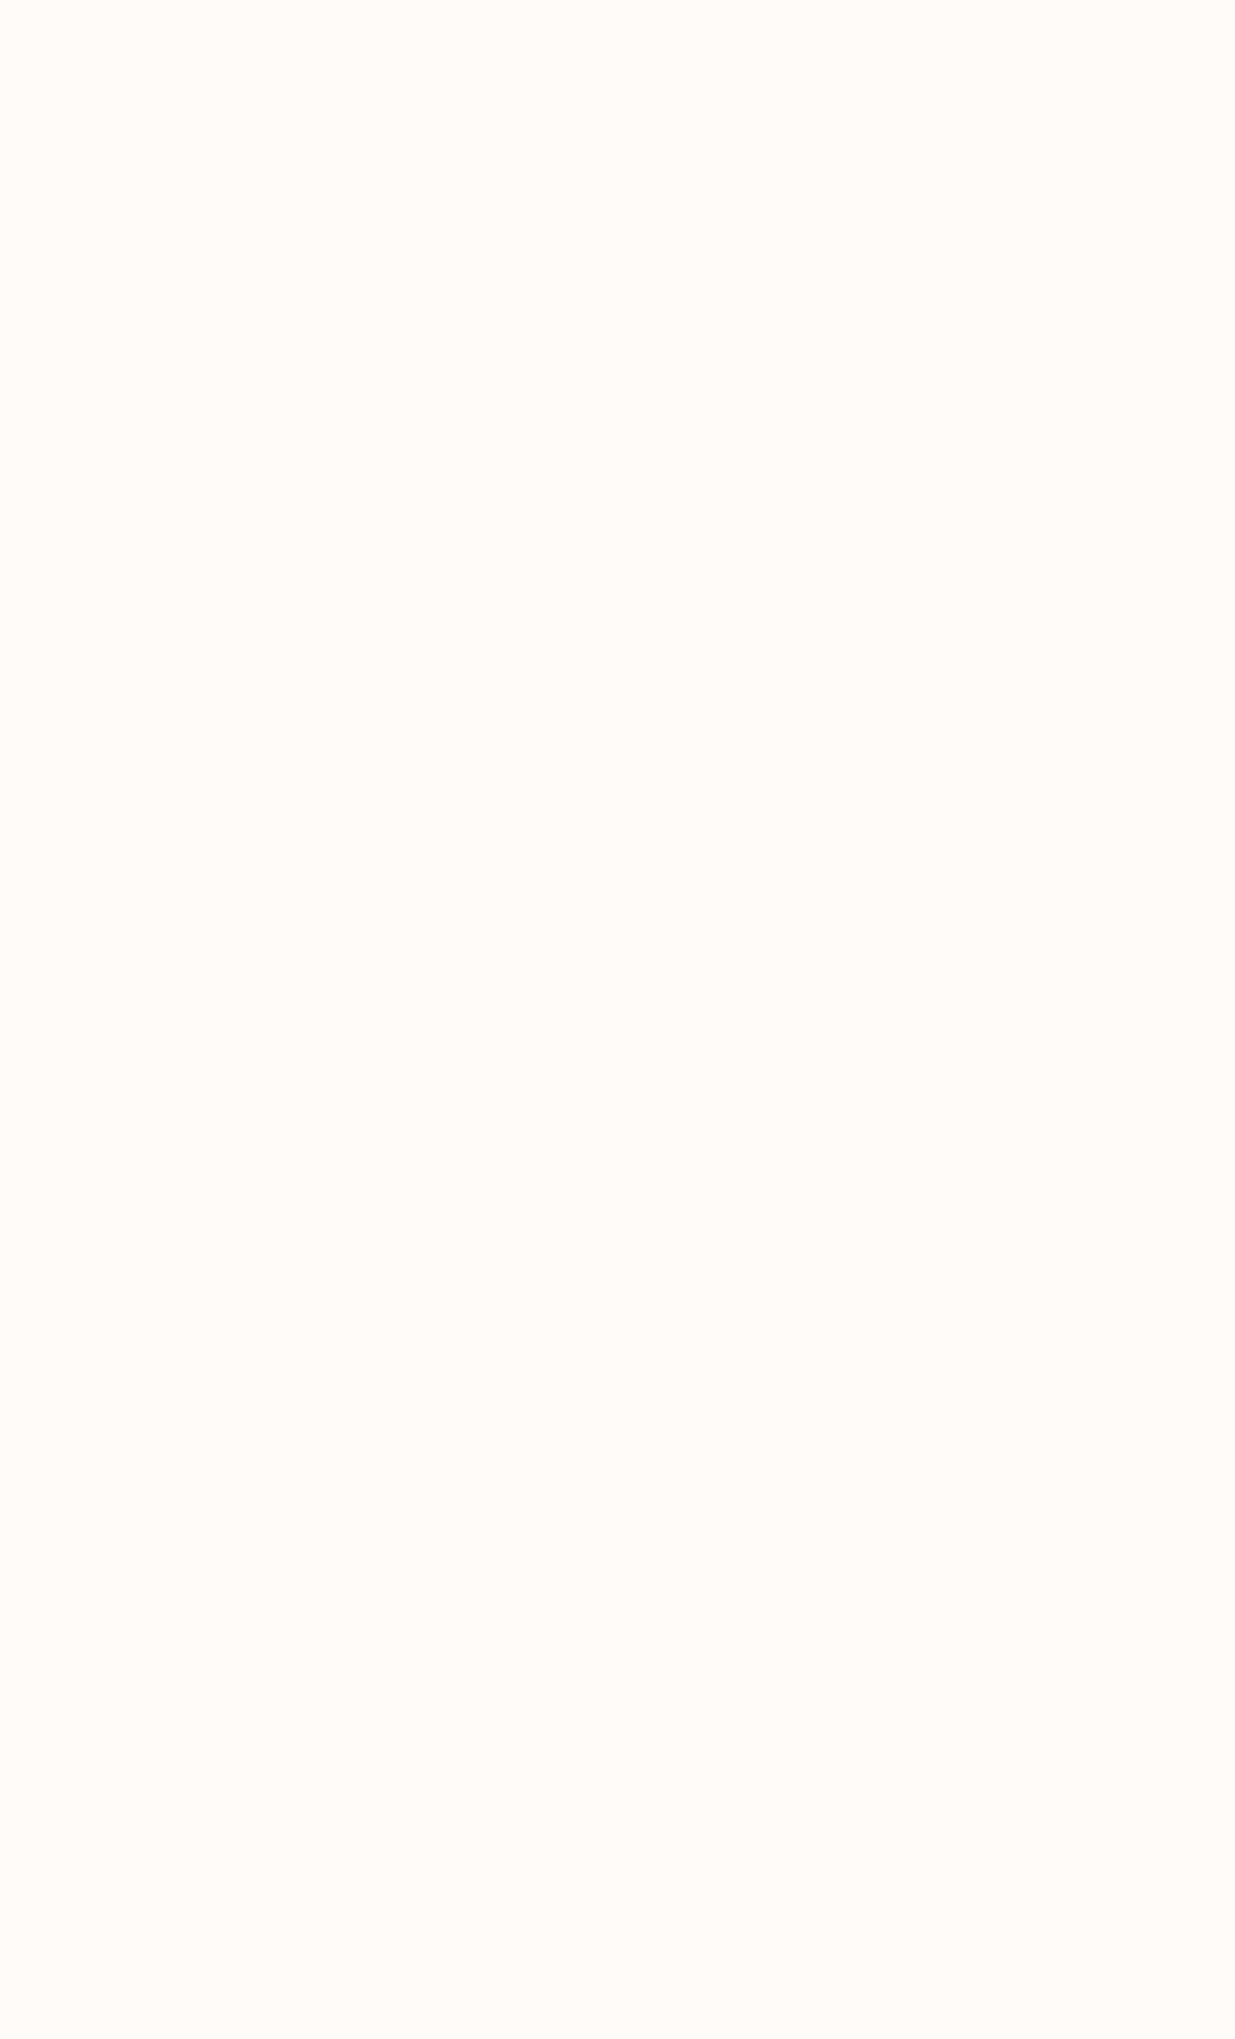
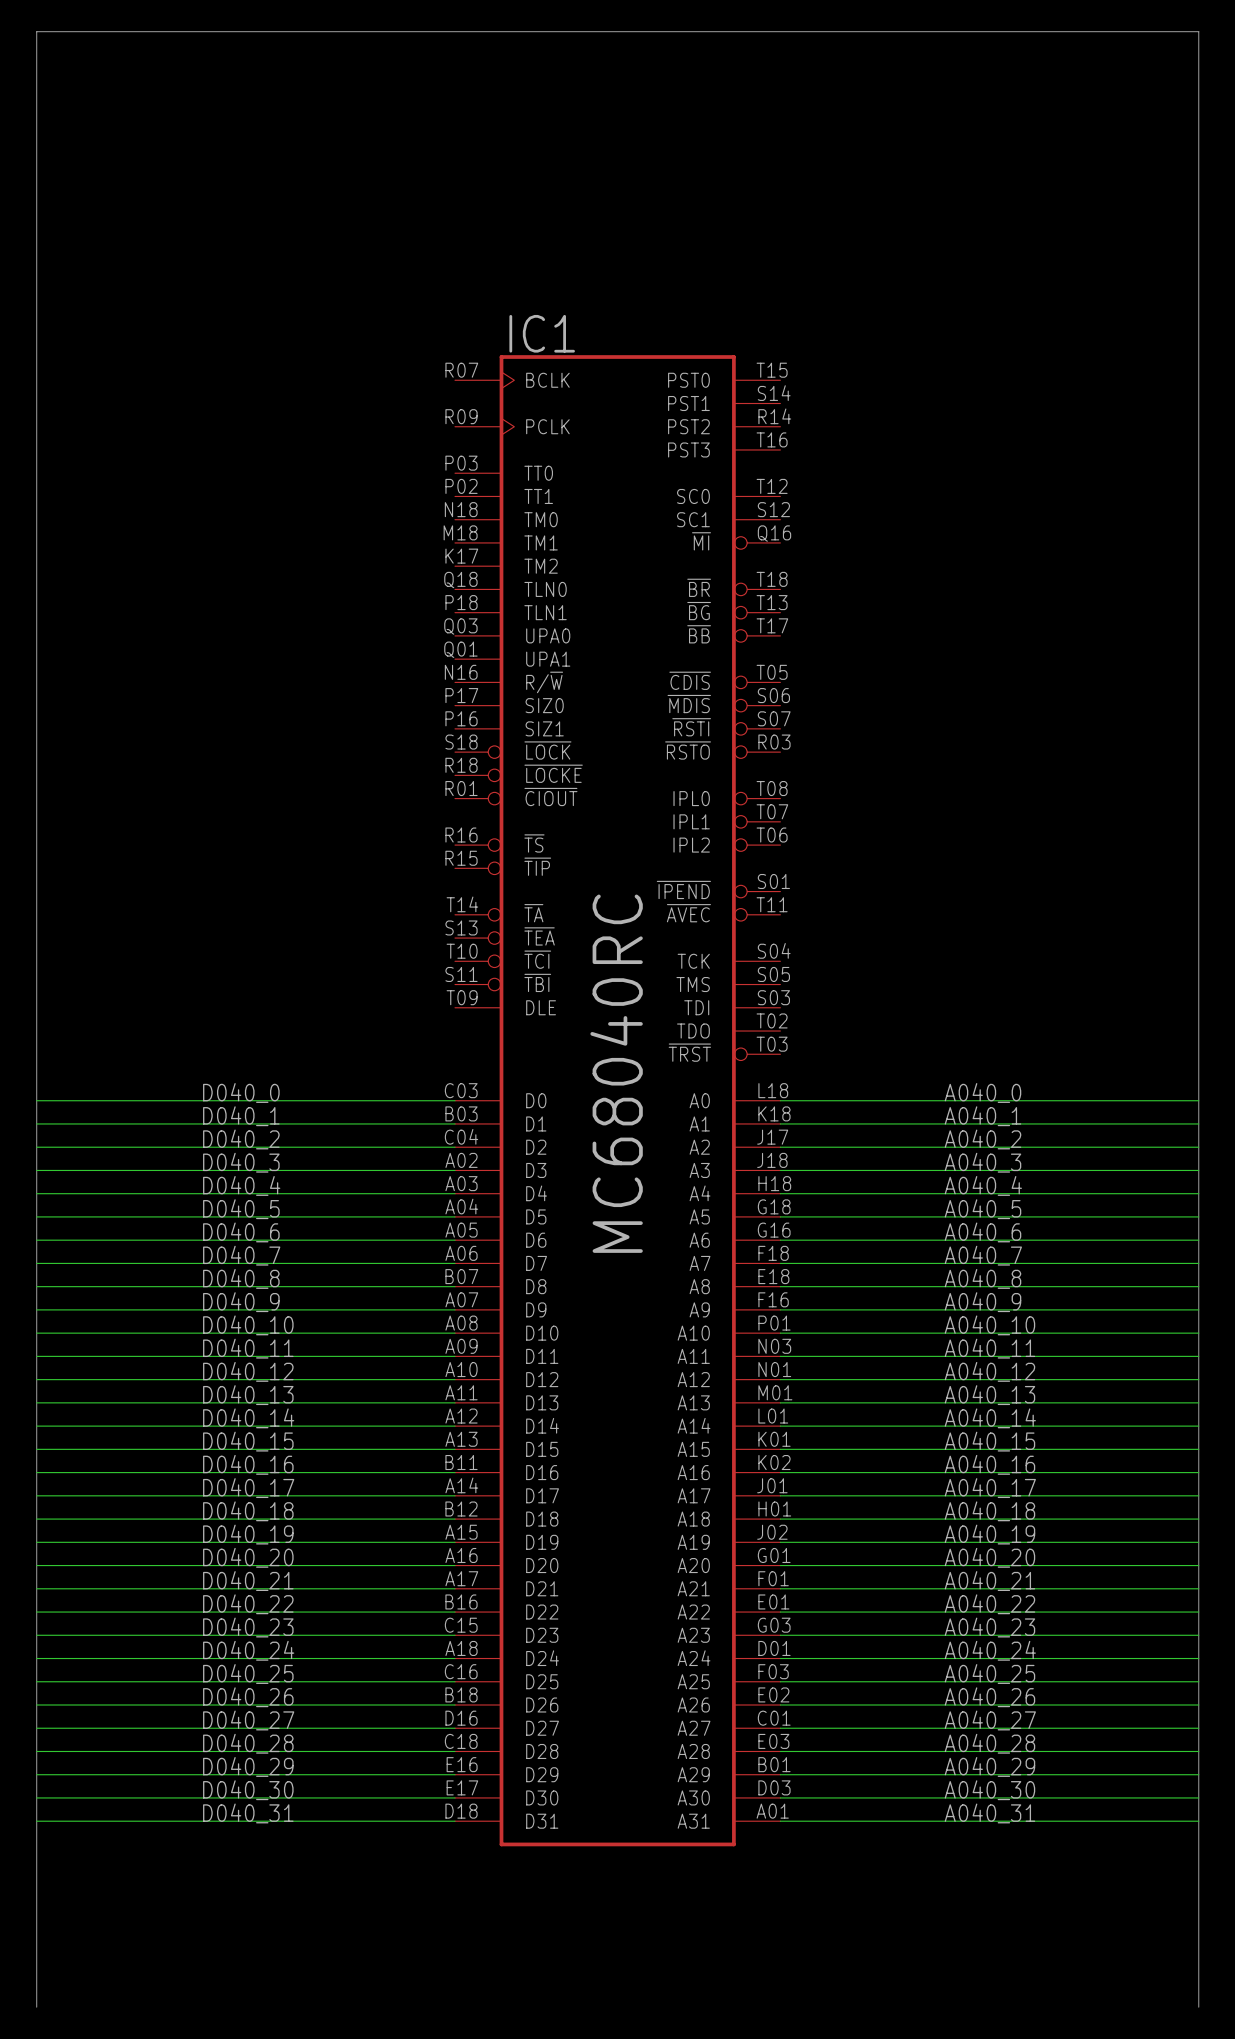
label: none -> D040_0 (241, 1092)
label: none -> A040_0 (982, 1092)
wire: none -> (36, 1100) (455, 1100)
IC1: none -> MC68040RC (617, 1100)
wire: none -> (780, 1100) (1198, 1100)
label: none -> D040_1 (241, 1116)
label: none -> A040_1 (982, 1116)
wire: none -> (36, 1123) (455, 1123)
wire: none -> (780, 1123) (1198, 1123)
label: none -> D040_2 (241, 1139)
label: none -> A040_2 (982, 1139)
wire: none -> (36, 1147) (455, 1147)
wire: none -> (780, 1147) (1198, 1147)
label: none -> D040_3 (241, 1162)
label: none -> A040_3 (982, 1162)
wire: none -> (36, 1170) (455, 1170)
wire: none -> (780, 1170) (1198, 1170)
label: none -> D040_4 (241, 1185)
label: none -> A040_4 (983, 1185)
wire: none -> (36, 1193) (455, 1193)
wire: none -> (780, 1193) (1198, 1193)
label: none -> D040_5 (241, 1209)
label: none -> A040_5 (982, 1209)
wire: none -> (36, 1216) (455, 1216)
wire: none -> (780, 1216) (1198, 1216)
label: none -> D040_6 (241, 1232)
label: none -> A040_6 (982, 1232)
wire: none -> (36, 1240) (455, 1240)
wire: none -> (780, 1240) (1198, 1240)
label: none -> D040_7 (241, 1255)
label: none -> A040_7 (983, 1255)
wire: none -> (36, 1263) (455, 1263)
wire: none -> (780, 1263) (1198, 1263)
label: none -> D040_8 (241, 1278)
label: none -> A040_8 (982, 1278)
wire: none -> (36, 1286) (455, 1286)
wire: none -> (780, 1286) (1198, 1286)
label: none -> D040_9 (241, 1302)
label: none -> A040_9 (982, 1302)
wire: none -> (36, 1309) (455, 1309)
wire: none -> (780, 1309) (1198, 1309)
label: none -> D040_10 (248, 1325)
label: none -> A040_10 (989, 1325)
wire: none -> (36, 1333) (455, 1333)
wire: none -> (780, 1333) (1198, 1333)
label: none -> D040_11 (248, 1348)
label: none -> A040_11 (989, 1348)
wire: none -> (36, 1356) (455, 1356)
wire: none -> (780, 1356) (1198, 1356)
label: none -> D040_12 (248, 1371)
label: none -> A040_12 (989, 1371)
wire: none -> (36, 1379) (455, 1379)
wire: none -> (780, 1379) (1198, 1379)
label: none -> D040_13 (248, 1395)
label: none -> A040_13 (989, 1395)
wire: none -> (36, 1402) (455, 1402)
wire: none -> (780, 1402) (1198, 1402)
label: none -> D040_14 (248, 1418)
label: none -> A040_14 (990, 1418)
wire: none -> (36, 1426) (455, 1426)
wire: none -> (780, 1426) (1198, 1426)
label: none -> D040_15 (248, 1441)
label: none -> A040_15 (989, 1441)
wire: none -> (36, 1449) (455, 1449)
wire: none -> (780, 1449) (1198, 1449)
label: none -> D040_16 (248, 1464)
label: none -> A040_16 (989, 1464)
wire: none -> (36, 1472) (455, 1472)
wire: none -> (780, 1472) (1198, 1472)
label: none -> D040_17 (248, 1488)
label: none -> A040_17 (990, 1488)
wire: none -> (36, 1495) (455, 1495)
wire: none -> (780, 1495) (1198, 1495)
label: none -> D040_18 (248, 1511)
label: none -> A040_18 (989, 1511)
wire: none -> (36, 1519) (455, 1519)
wire: none -> (780, 1519) (1198, 1519)
label: none -> D040_19 (248, 1534)
label: none -> A040_19 (989, 1534)
wire: none -> (36, 1542) (455, 1542)
wire: none -> (780, 1542) (1198, 1542)
label: none -> D040_20 (248, 1557)
label: none -> A040_20 (989, 1557)
wire: none -> (36, 1565) (455, 1565)
wire: none -> (780, 1565) (1198, 1565)
label: none -> D040_21 (248, 1581)
label: none -> A040_21 (989, 1581)
wire: none -> (36, 1588) (455, 1588)
wire: none -> (780, 1588) (1198, 1588)
label: none -> D040_22 (248, 1604)
label: none -> A040_22 (989, 1604)
wire: none -> (36, 1612) (455, 1612)
wire: none -> (780, 1612) (1198, 1612)
label: none -> D040_23 (248, 1627)
label: none -> A040_23 (989, 1627)
wire: none -> (36, 1635) (455, 1635)
wire: none -> (780, 1635) (1198, 1635)
label: none -> D040_24 (248, 1650)
label: none -> A040_24 (990, 1650)
wire: none -> (36, 1658) (455, 1658)
wire: none -> (780, 1658) (1198, 1658)
label: none -> D040_25 (248, 1674)
label: none -> A040_25 (989, 1674)
wire: none -> (36, 1681) (455, 1681)
wire: none -> (780, 1681) (1198, 1681)
label: none -> D040_26 (248, 1697)
label: none -> A040_26 (989, 1697)
wire: none -> (36, 1705) (455, 1705)
wire: none -> (780, 1705) (1198, 1705)
label: none -> D040_27 (248, 1720)
label: none -> A040_27 (990, 1720)
wire: none -> (36, 1728) (455, 1728)
wire: none -> (780, 1728) (1198, 1728)
label: none -> D040_28 (248, 1743)
label: none -> A040_28 (989, 1743)
wire: none -> (36, 1751) (455, 1751)
wire: none -> (780, 1751) (1198, 1751)
label: none -> D040_29 (248, 1766)
label: none -> A040_29 (989, 1766)
wire: none -> (36, 1774) (455, 1774)
wire: none -> (780, 1774) (1198, 1774)
label: none -> D040_30 (248, 1790)
label: none -> A040_30 (989, 1790)
wire: none -> (36, 1797) (455, 1797)
wire: none -> (780, 1797) (1198, 1797)
label: none -> D040_31 (248, 1813)
label: none -> A040_31 (989, 1813)
wire: none -> (36, 1821) (455, 1821)
wire: none -> (780, 1821) (1198, 1821)
bus: none -> (36, 2007) (36, 31) (1198, 31) (1198, 2007)

